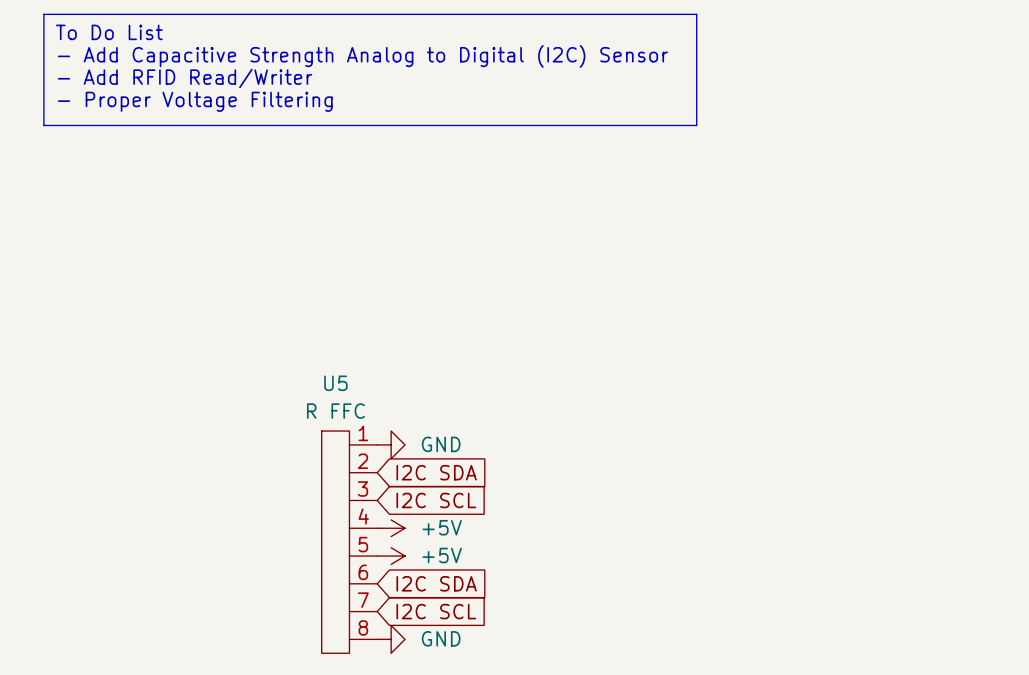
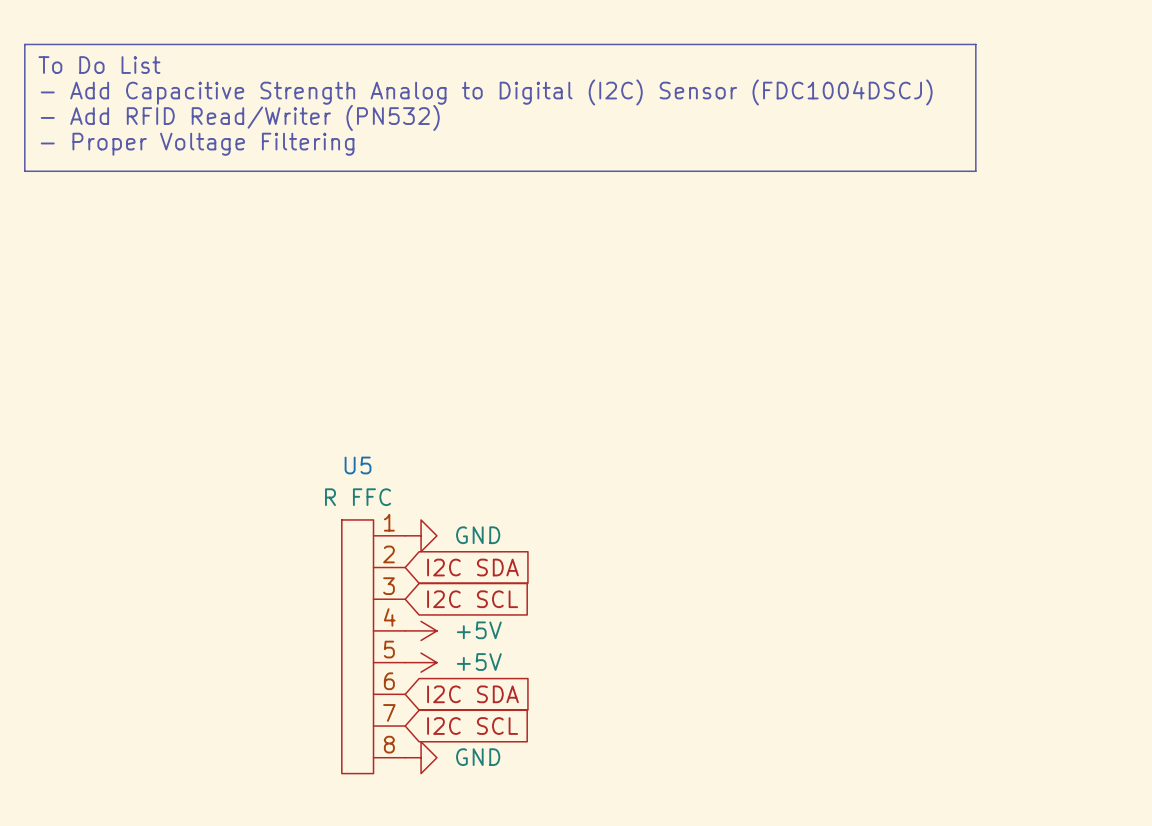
line: (696, 14) (696, 125) -> (769, 44) (975, 44) (975, 171) (769, 171)
text: - Add Capacitive Strength Analog to Digital (I2C) Sensor (362, 56) -> - Add Capacitive Strength Analog to Digital (I2C) Sensor (FDC1004DSCJ) (486, 92)
text: - Add RFID Read/Writer (185, 78) -> - Add RFID Read/Writer (PN532) (240, 117)

